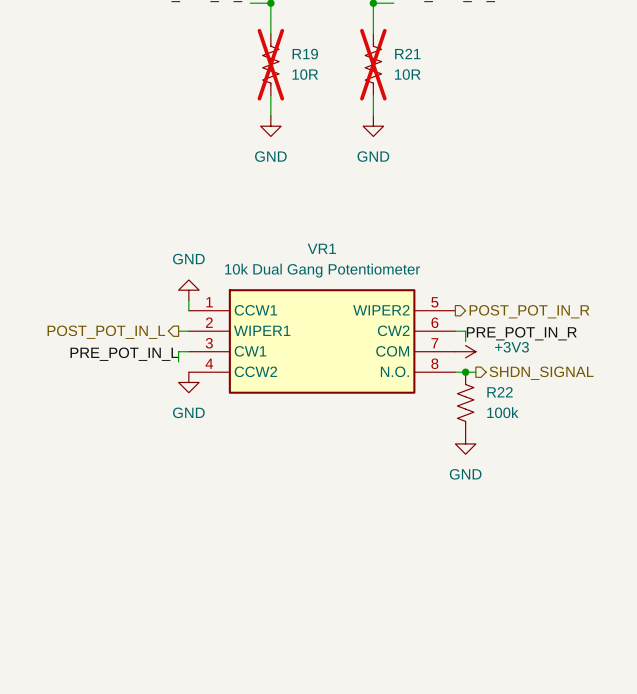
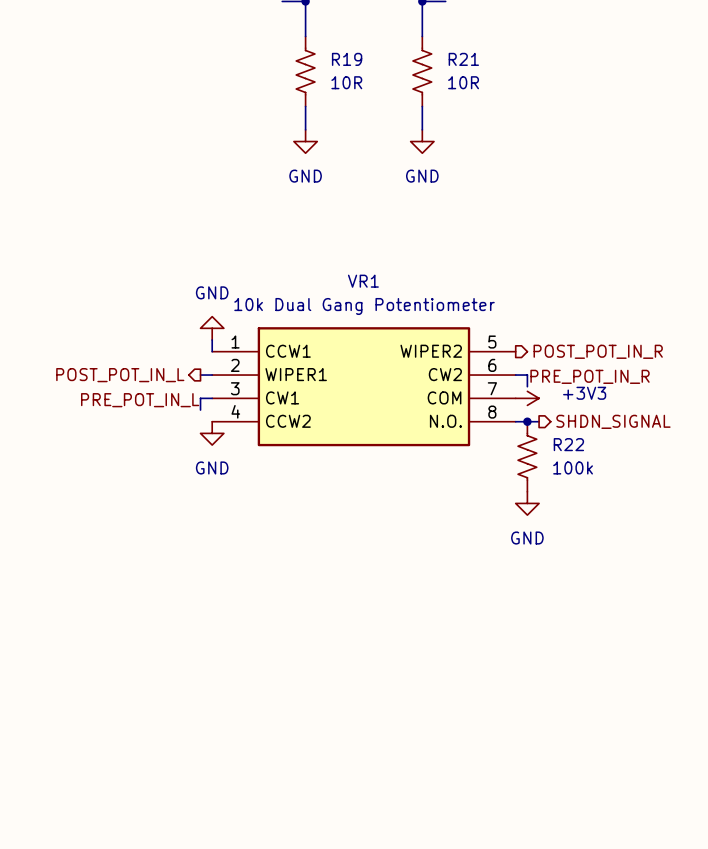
R19 do-not-place cross: (270, 64) -> none
R21 do-not-place cross: (373, 64) -> none

